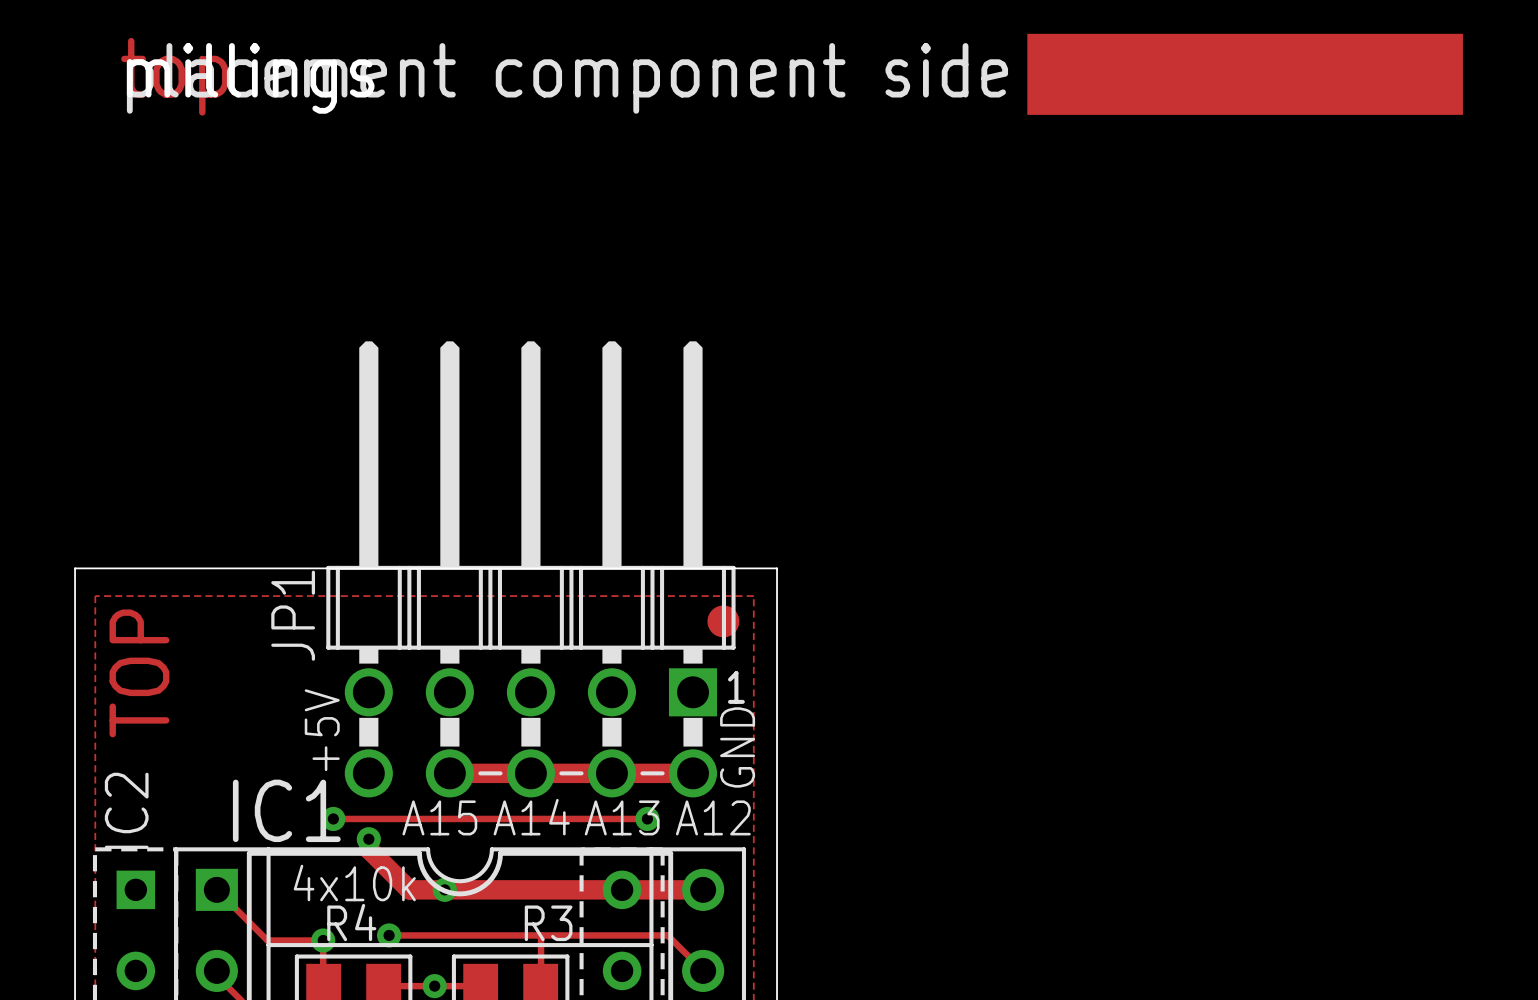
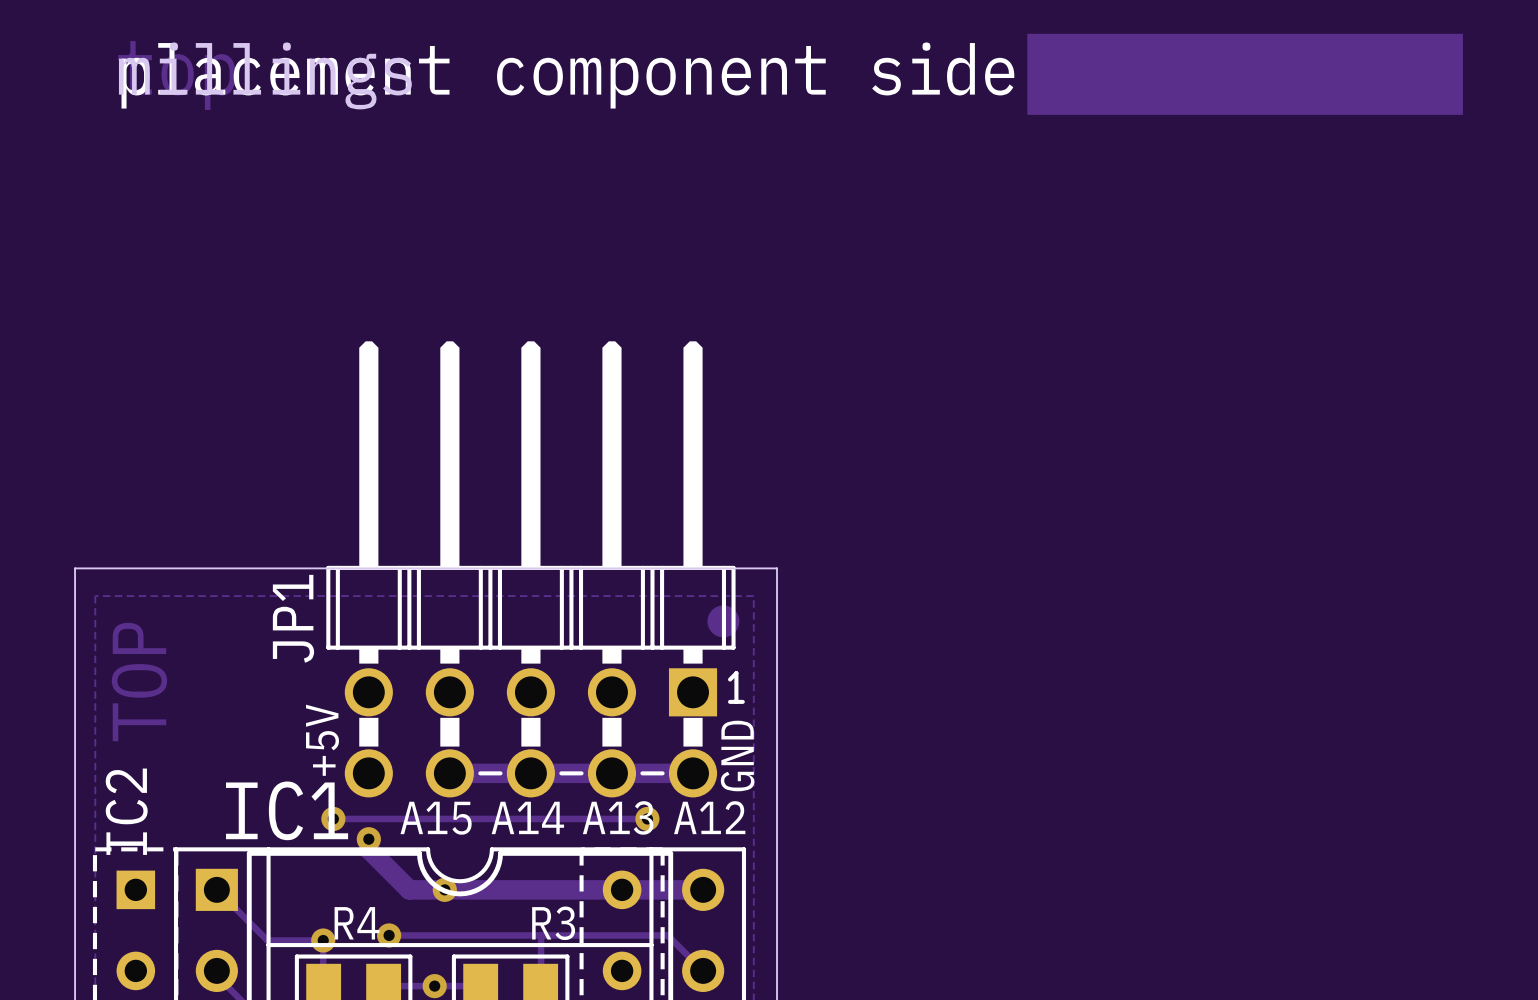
text: 4x10k (354, 883) -> none

